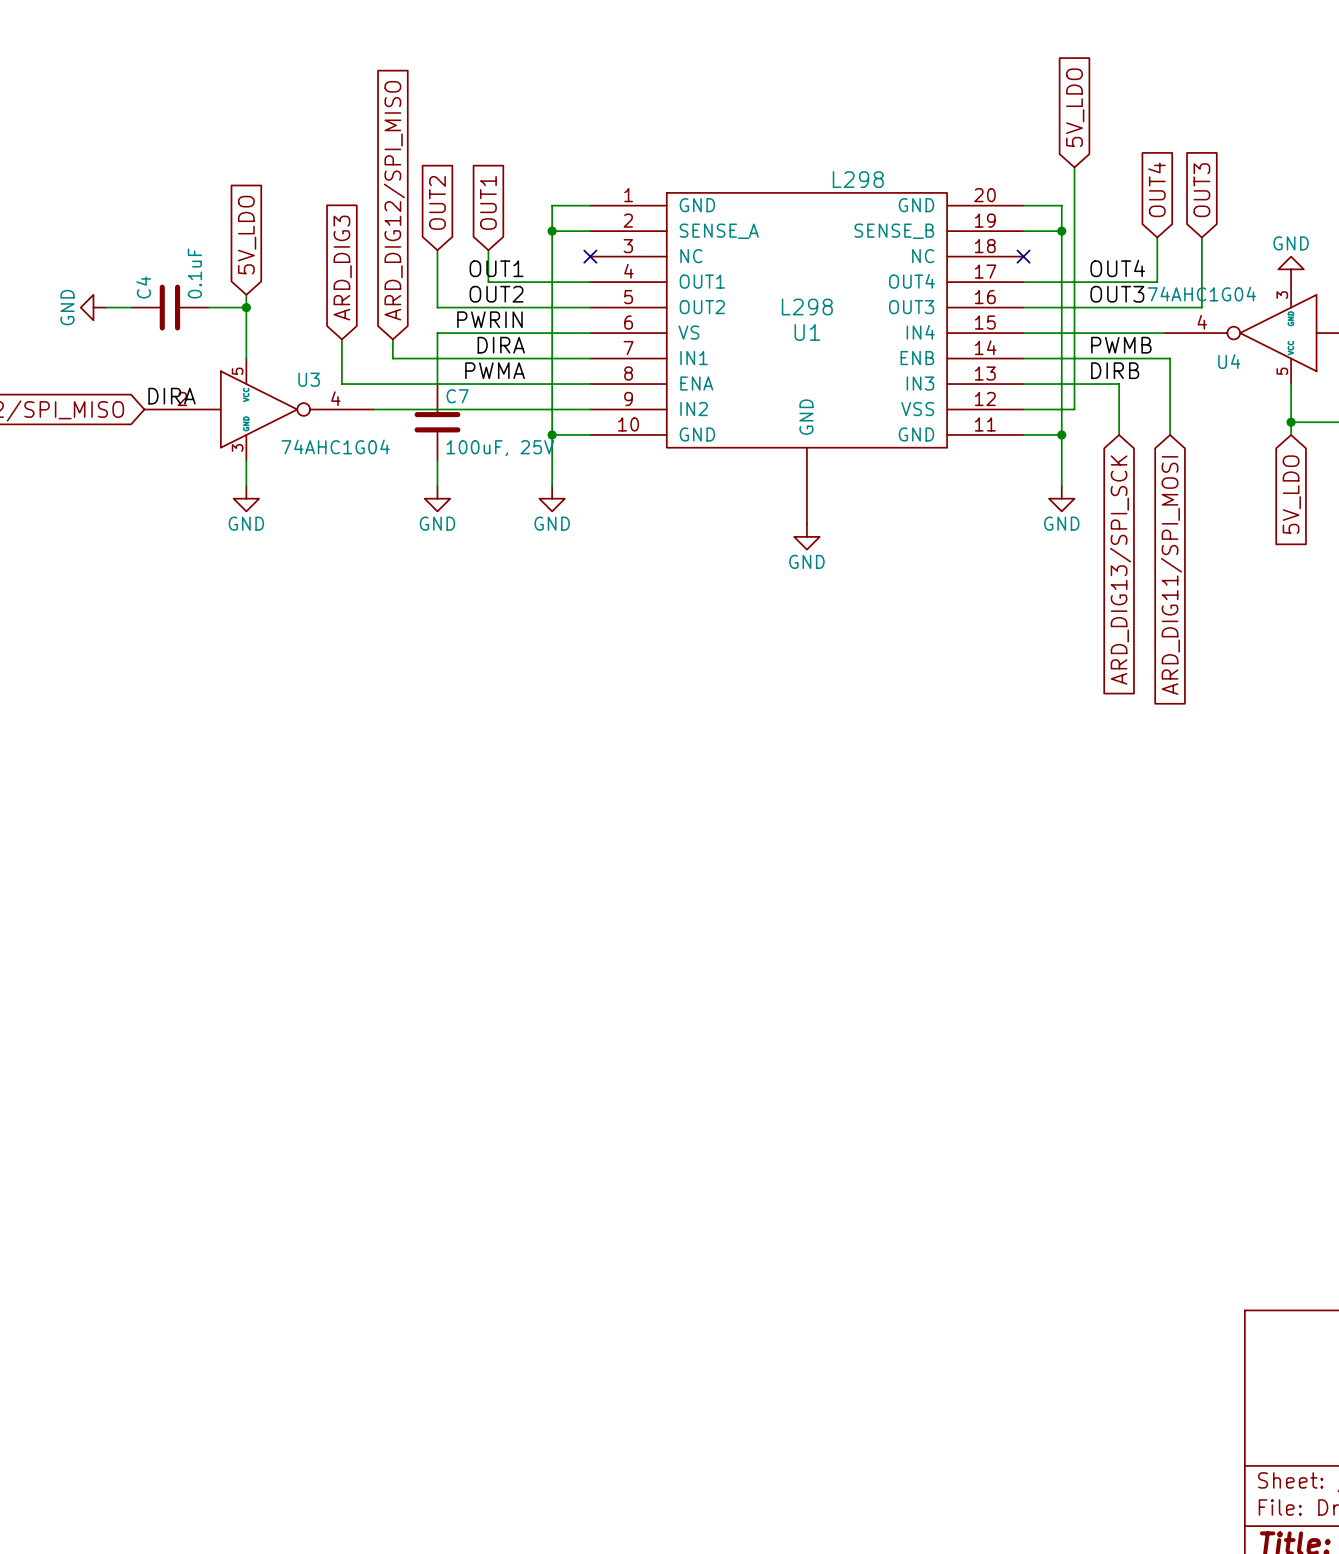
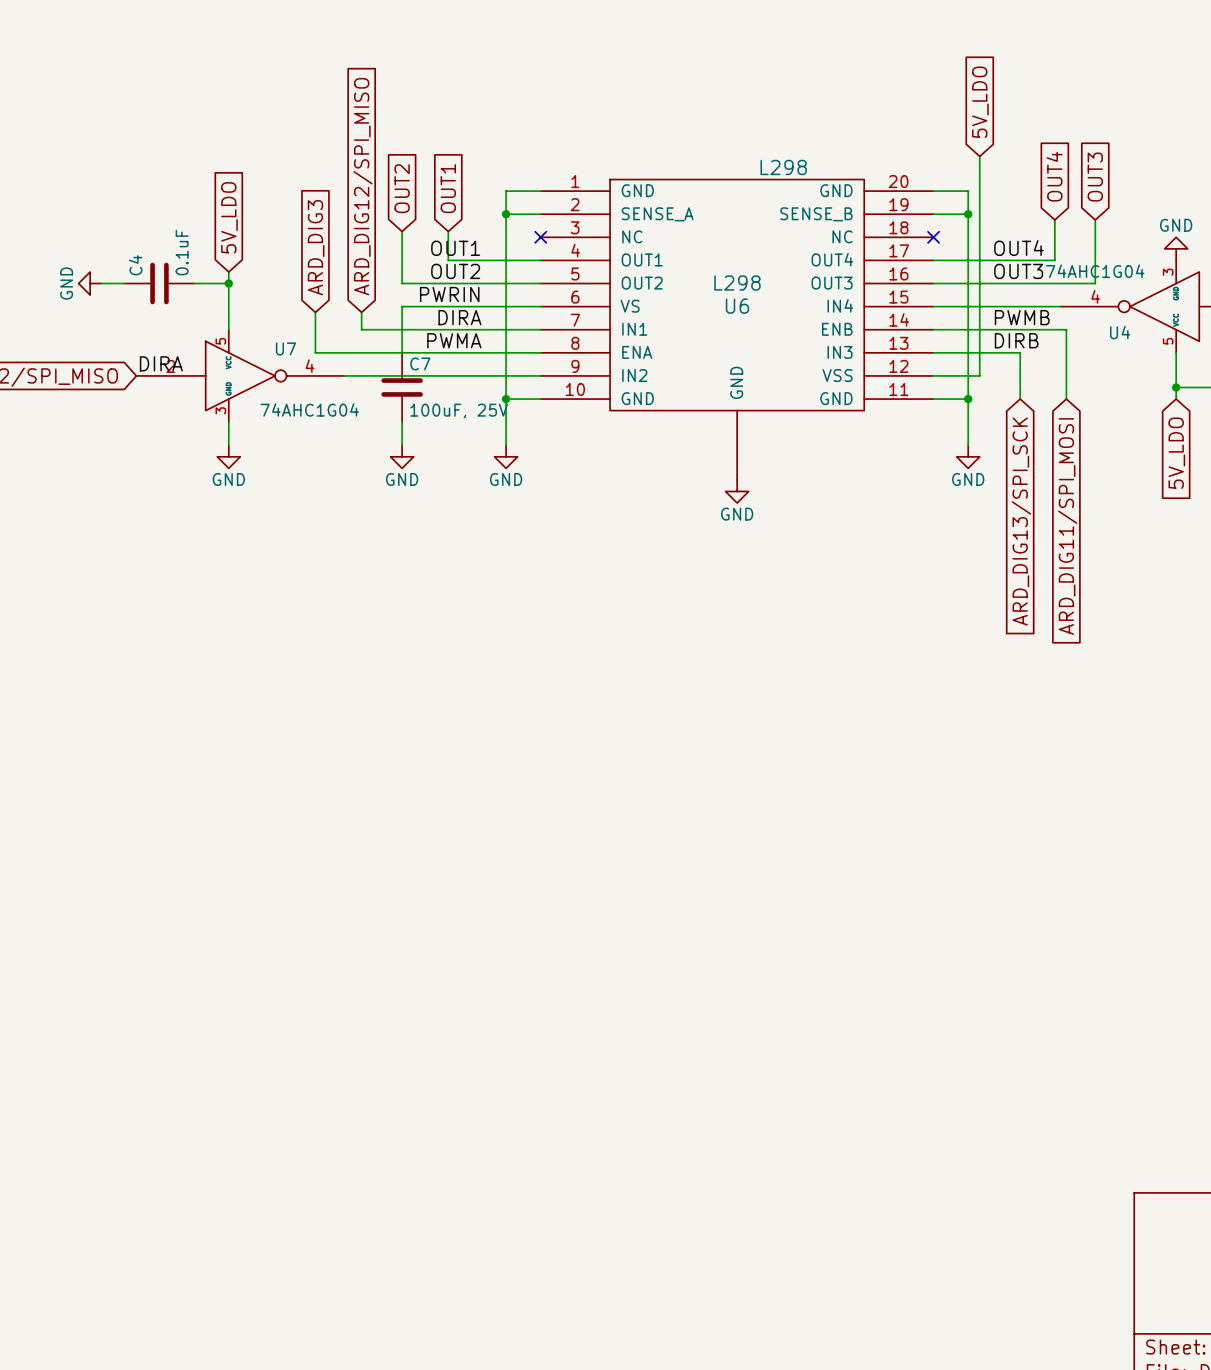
U1 name: U1 (807, 332) -> U6 (737, 306)
U3 name: U3 (309, 379) -> U7 (285, 348)

